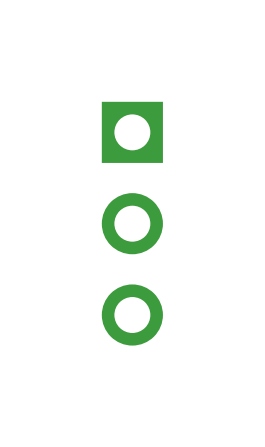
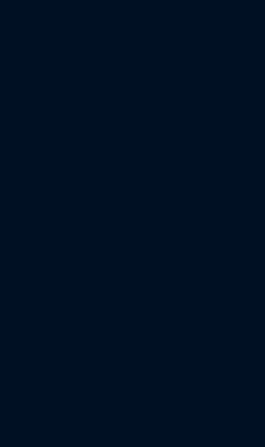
part: (132, 223) -> none

